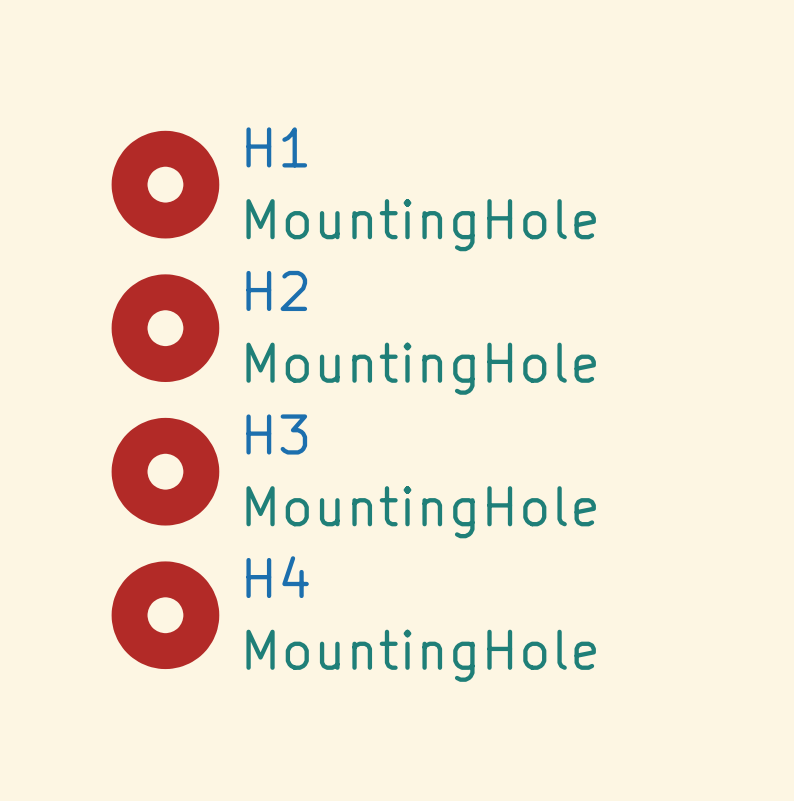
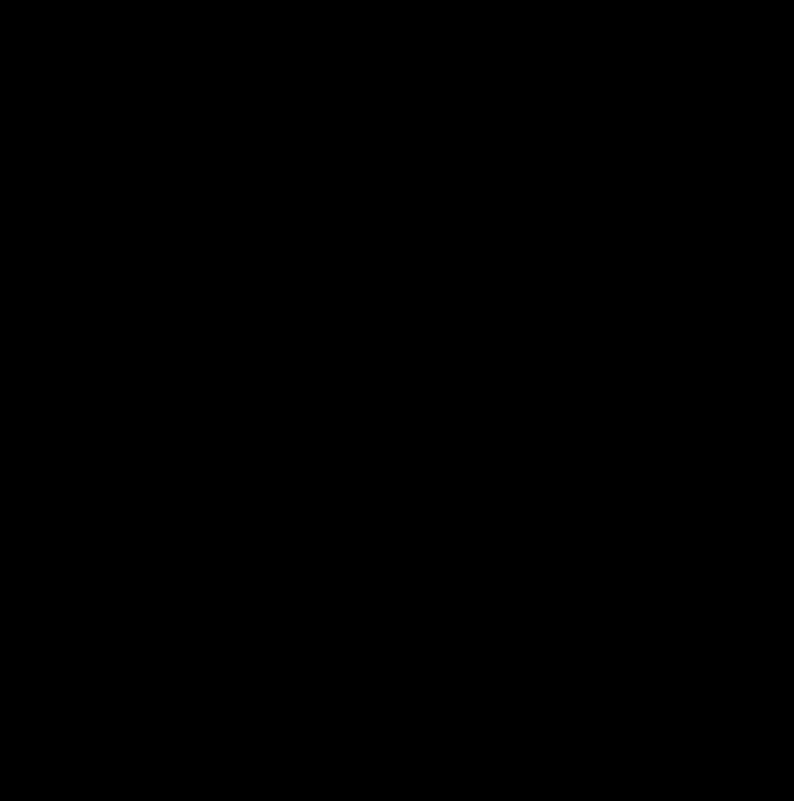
H1: MountingHole (165, 184) -> none
H2: MountingHole (165, 328) -> none
H3: MountingHole (165, 471) -> none
H4: MountingHole (165, 615) -> none

